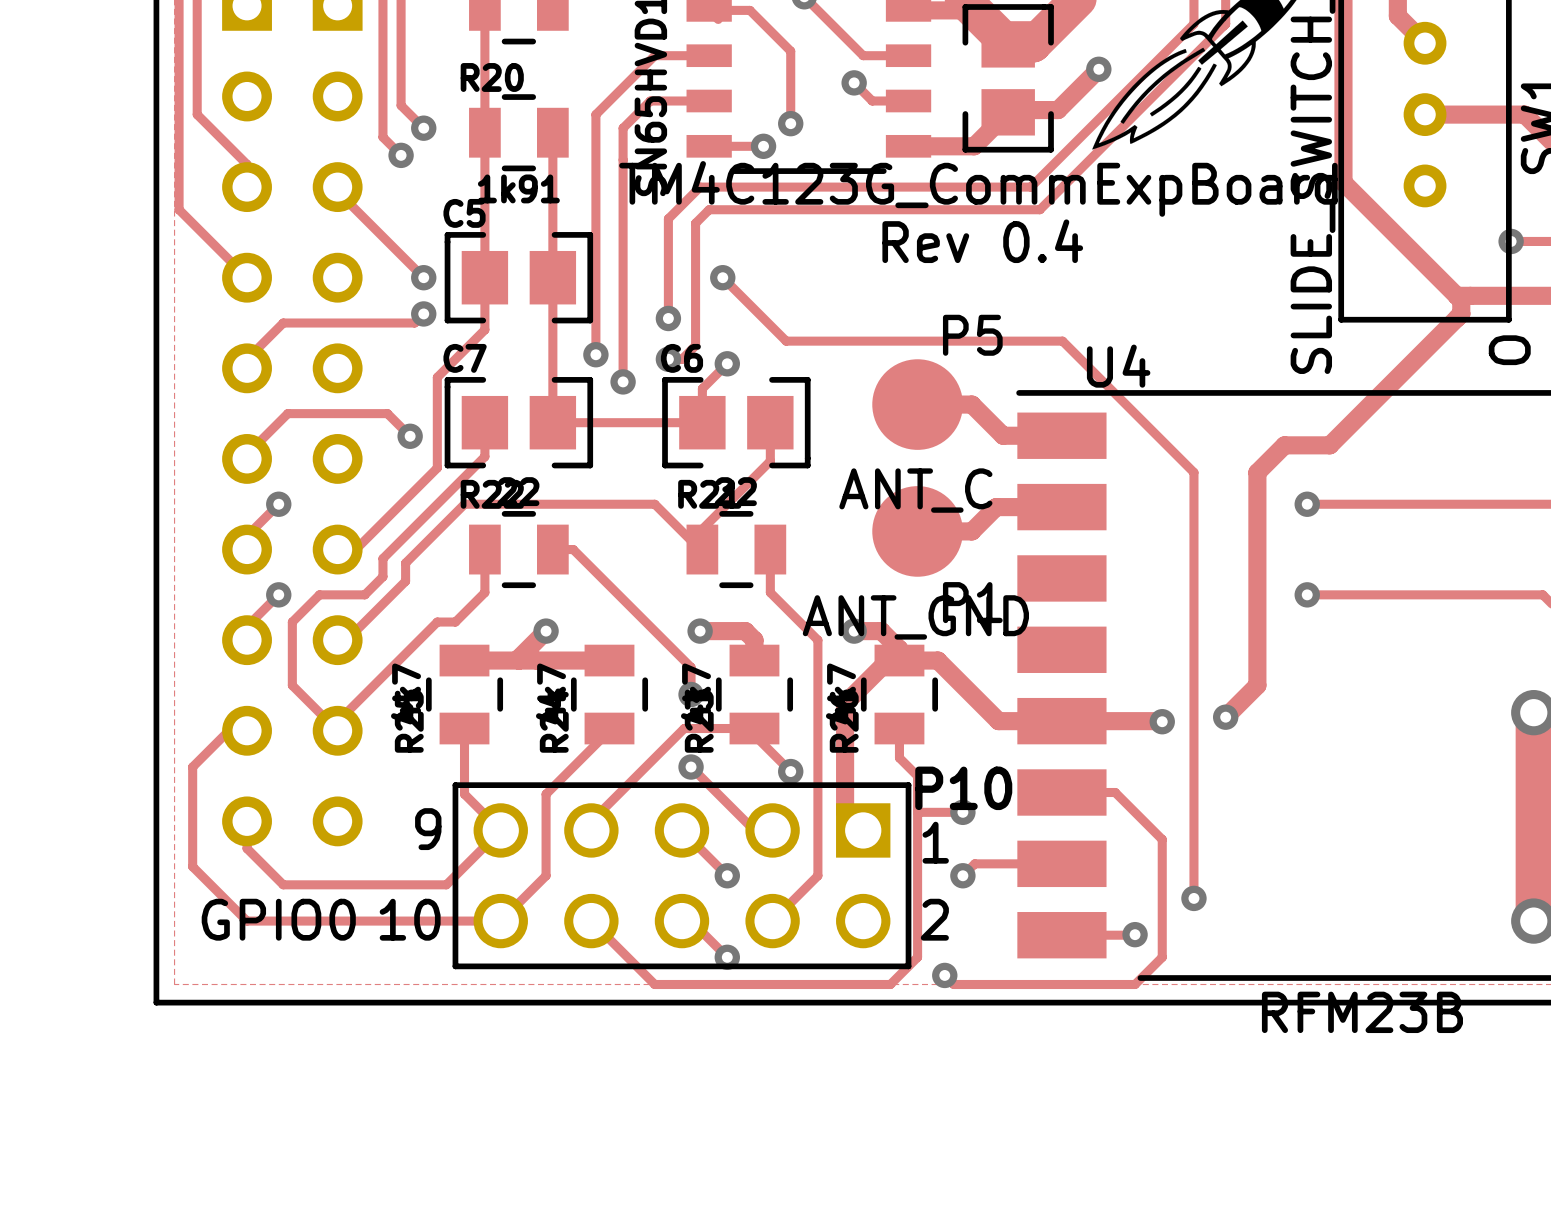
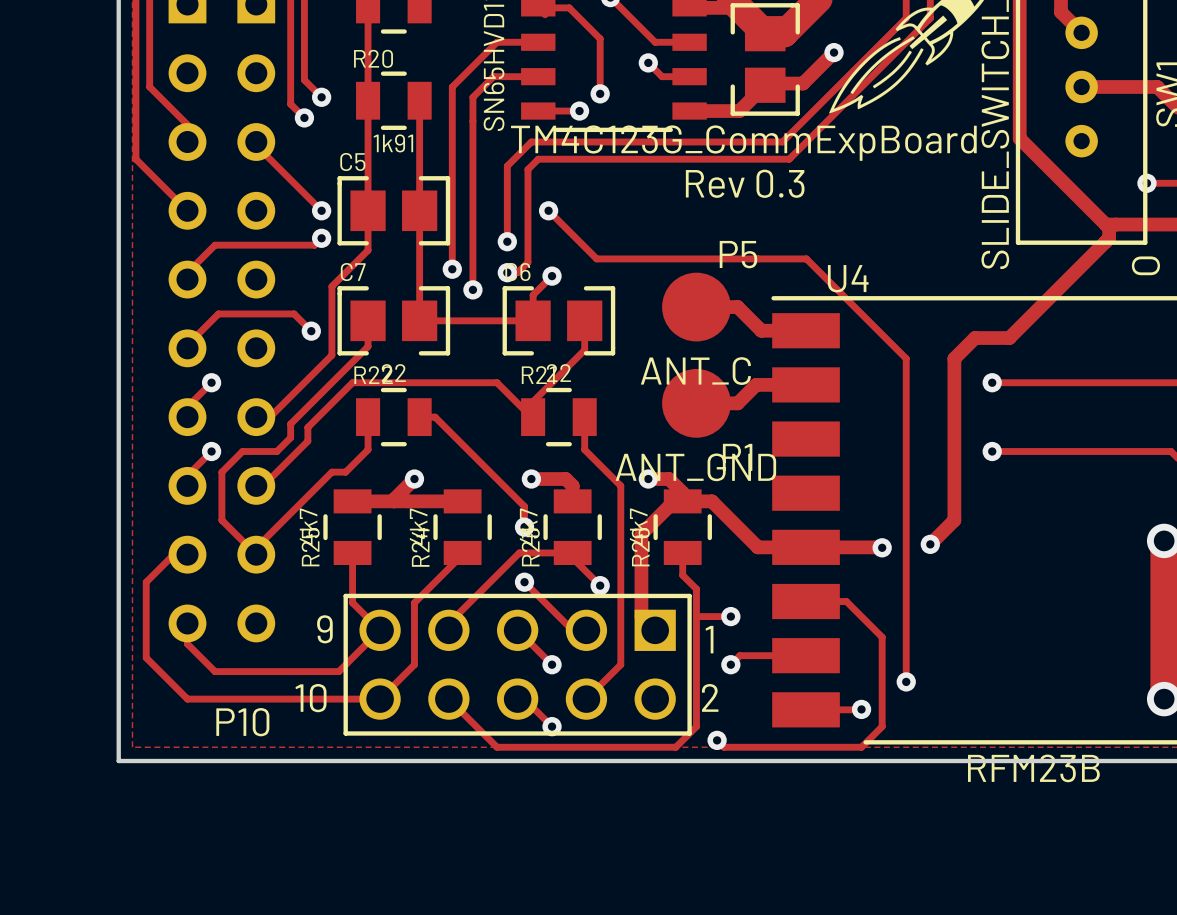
text: Rev 0.4 (982, 241) -> Rev 0.3 (745, 183)
P10 name position: P10 (963, 788) -> P10 (242, 722)
text: GPIO0 (278, 919) -> none

